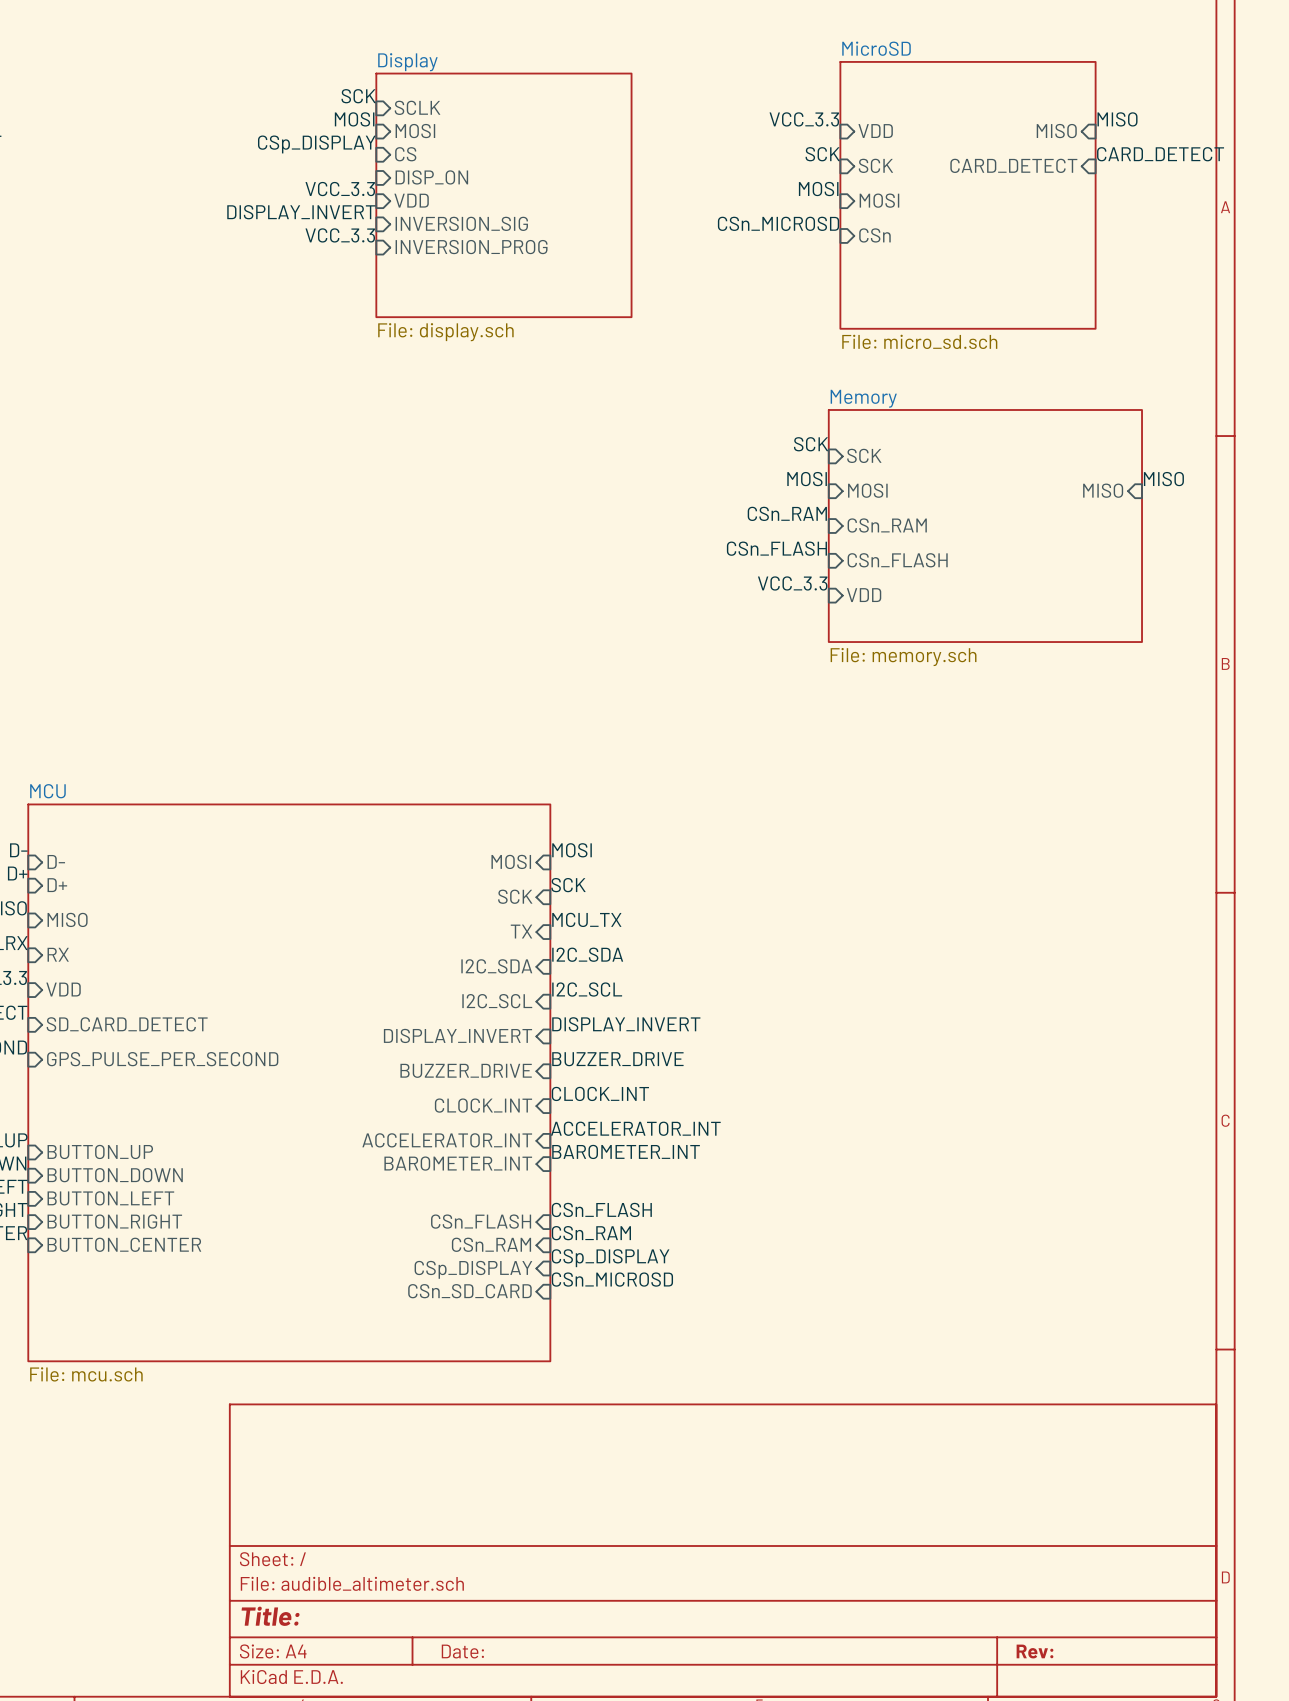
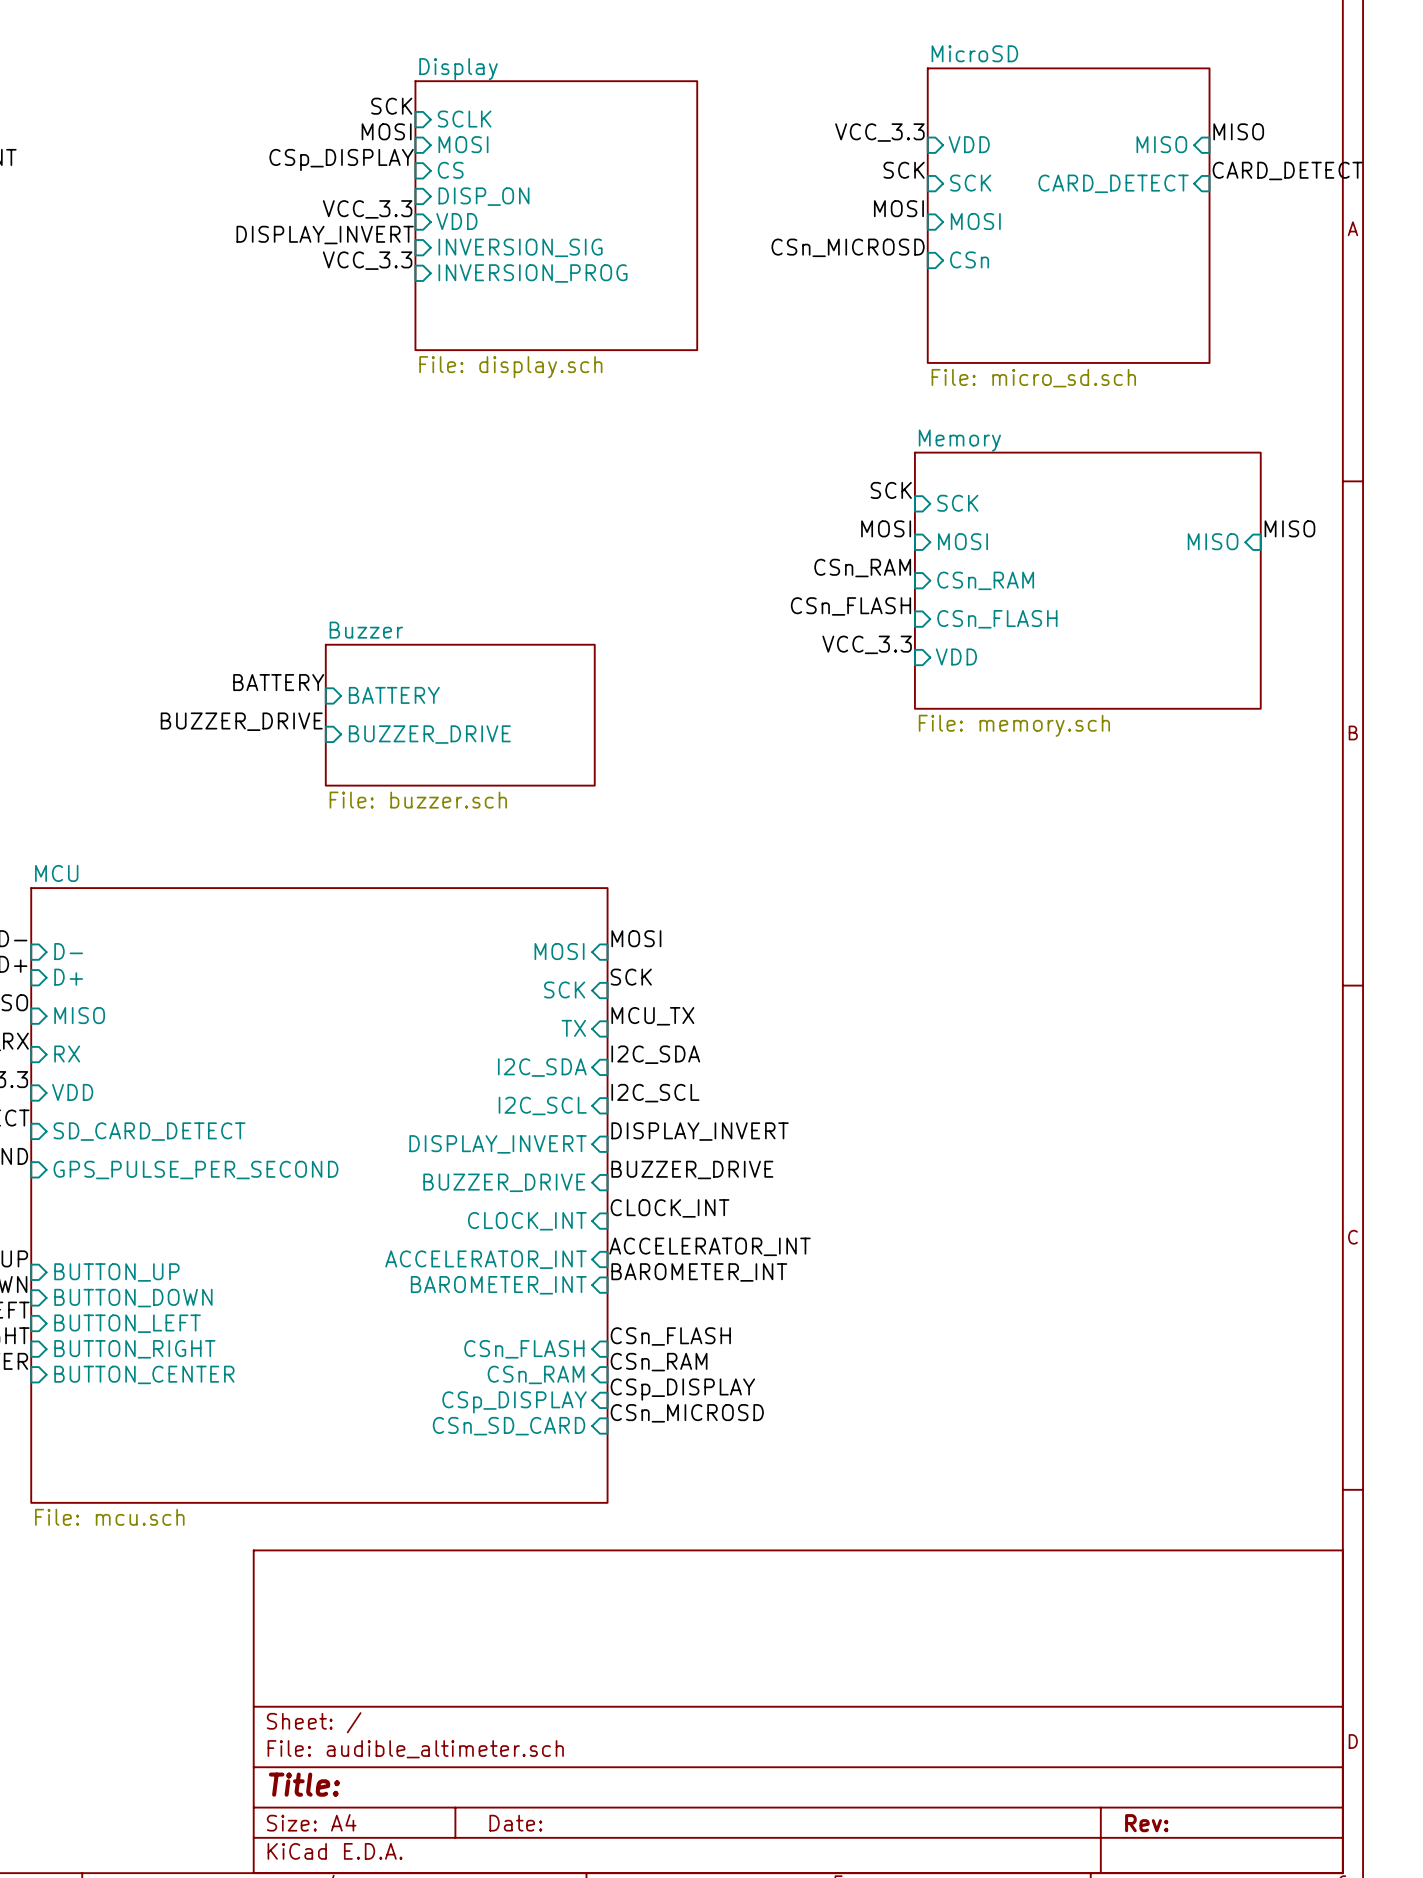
label: none -> BATTERY (278, 682)
sheet pin: none -> BATTERY (394, 695)
sheet Buzzer: none -> File: buzzer.sch (460, 715)
label: none -> BUZZER_DRIVE (241, 721)
sheet pin: none -> BUZZER_DRIVE (429, 734)

